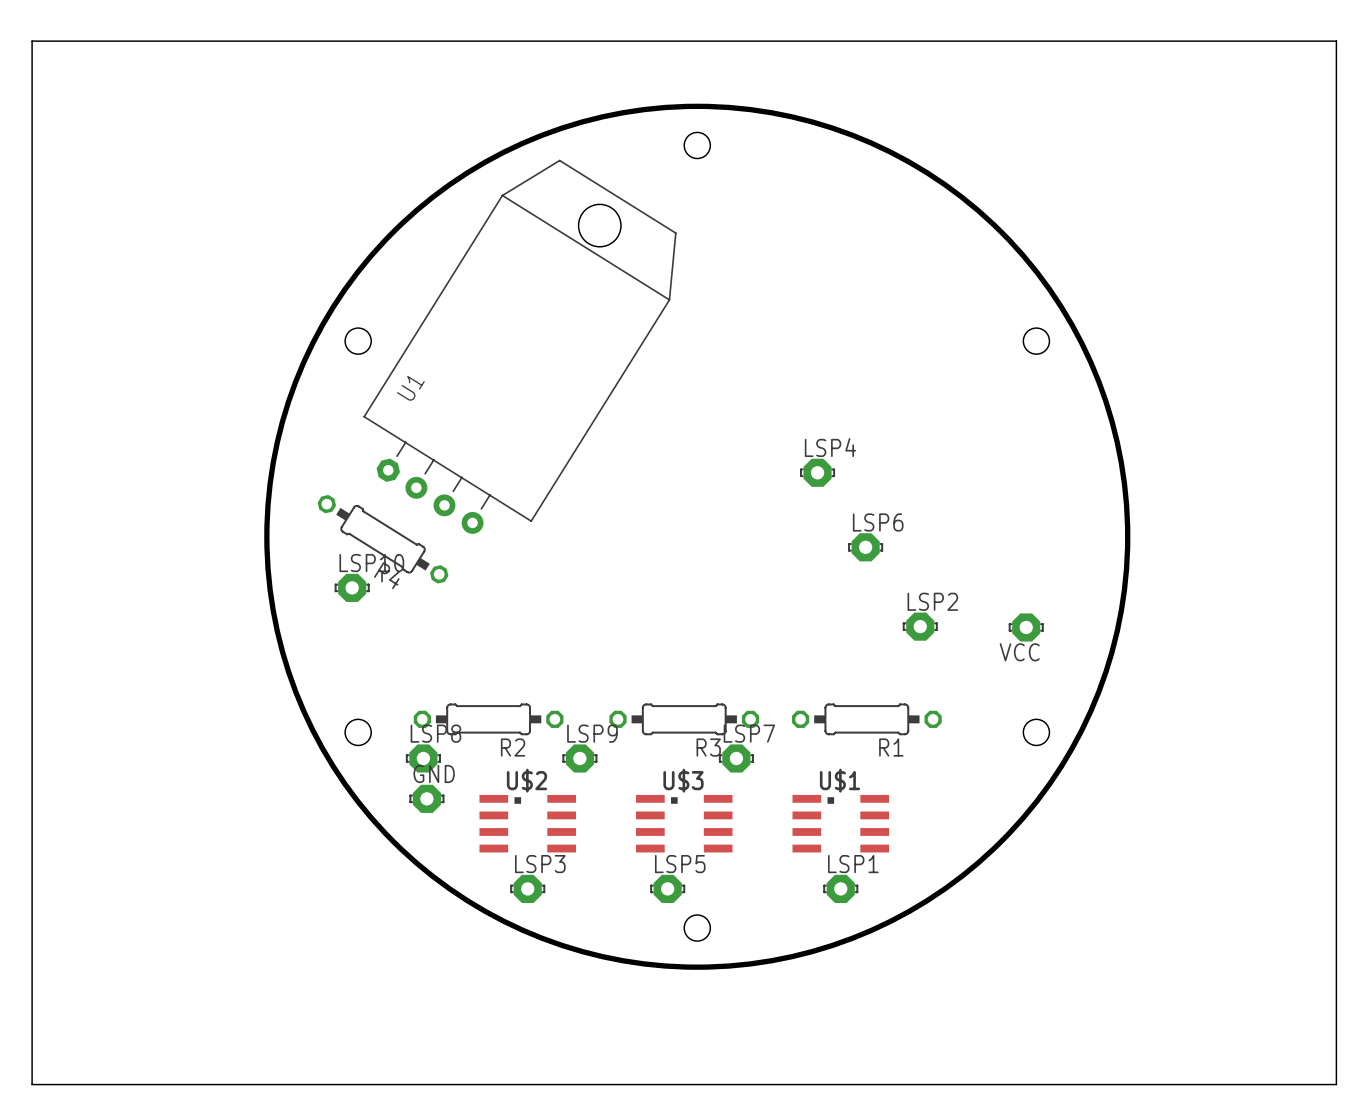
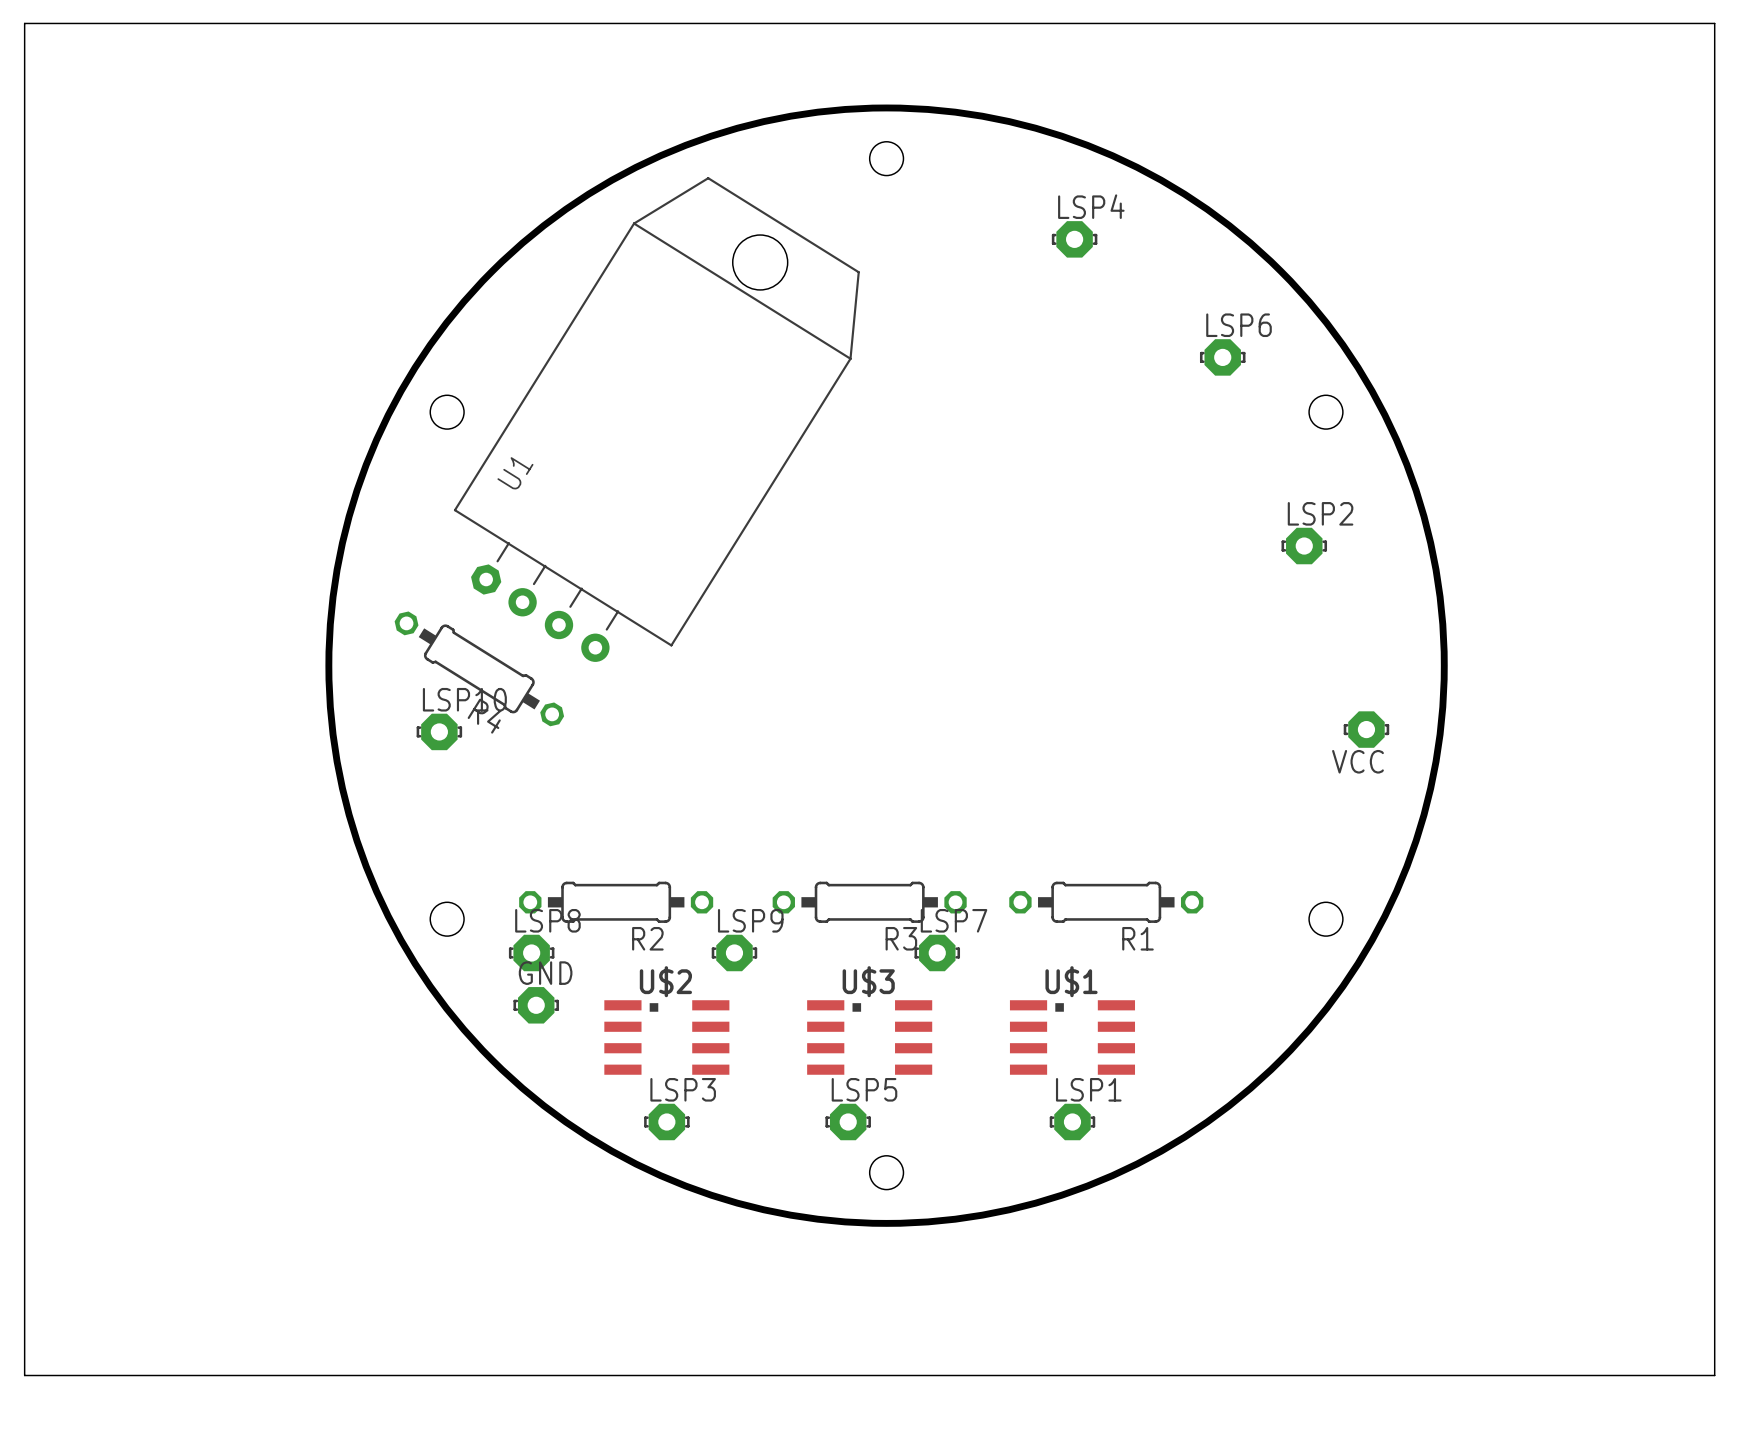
LSP4 position: (817, 472) -> (1074, 239)
LSP6 position: (865, 547) -> (1222, 357)
LSP2 position: (920, 626) -> (1304, 546)
VCC position: (1026, 627) -> (1366, 729)

